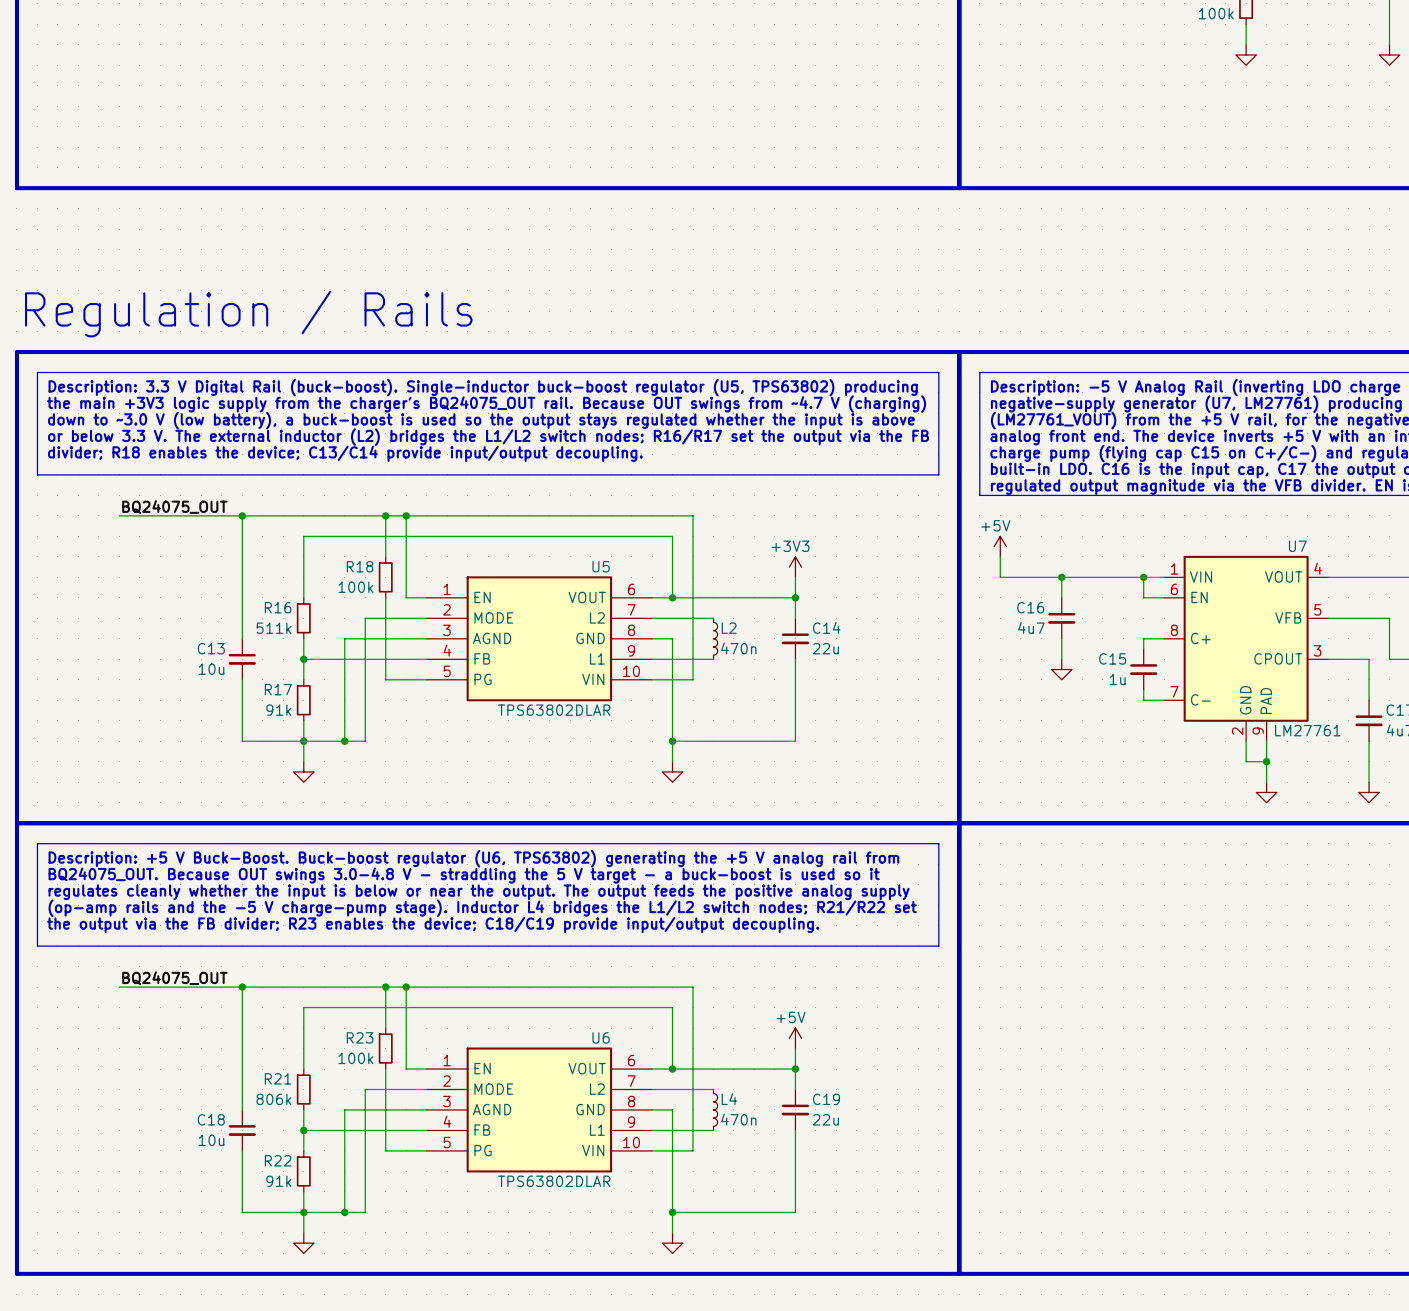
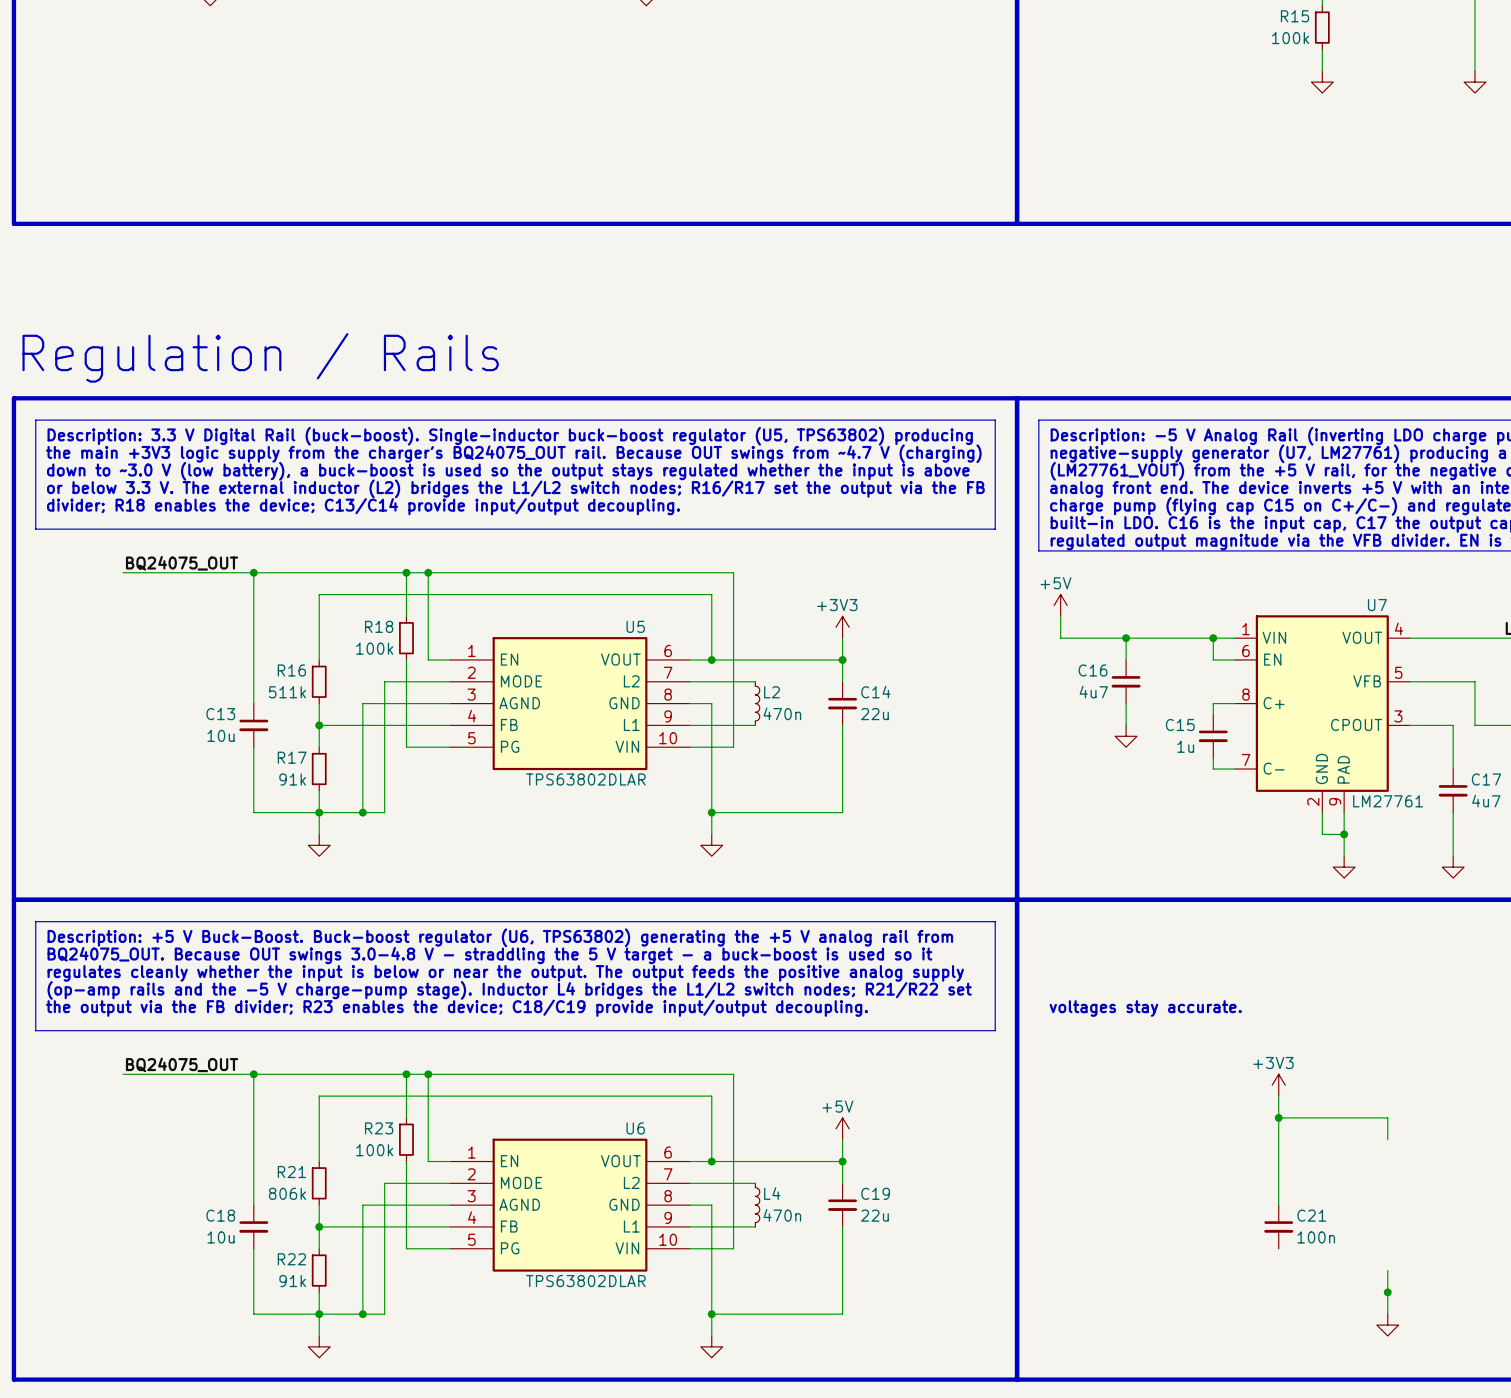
text: none -> voltages stay accurate. (1145, 1008)
power symbol: none -> +3V3 (1278, 1085)
wire: none -> (1278, 1096) (1278, 1205)
wire: none -> (1278, 1117) (1387, 1117) (1387, 1139)
junction: none -> (1278, 1117)
C21: none -> 100n (1278, 1226)
wire: none -> (1387, 1270) (1387, 1314)
junction: none -> (1387, 1292)
power symbol: none -> (1387, 1325)

